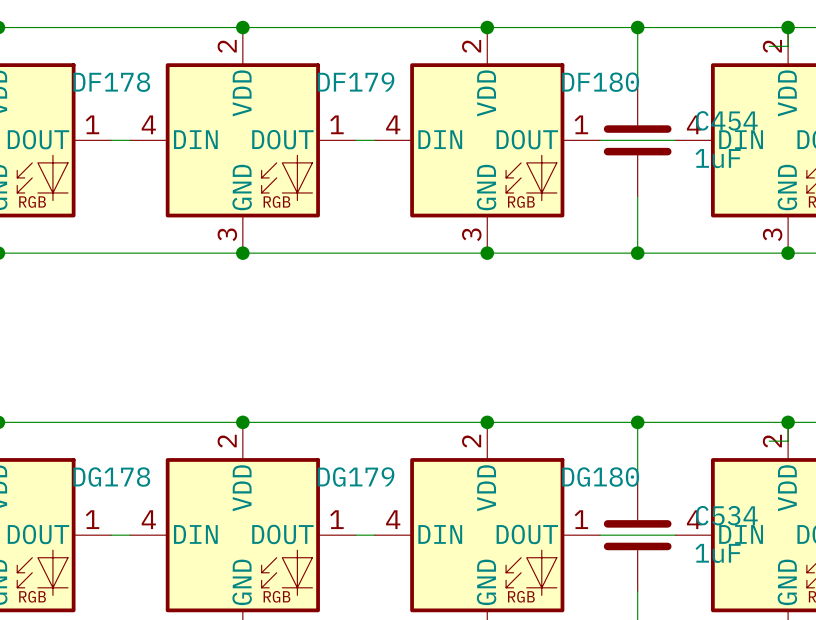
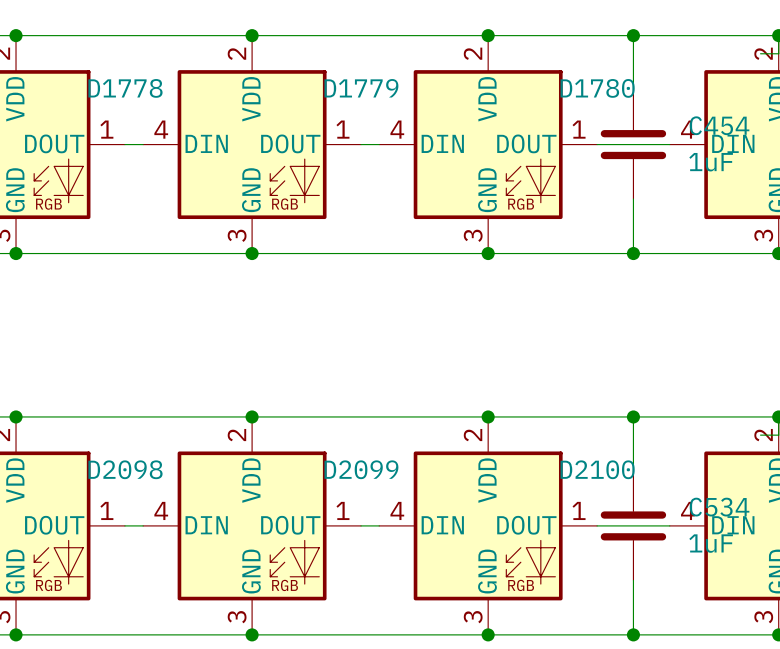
DF178 name: DF178 (111, 82) -> D1778 (125, 88)
DF179 name: DF179 (356, 82) -> D1779 (361, 88)
DF180 name: DF180 (600, 82) -> D1780 (597, 88)
DG178 name: DG178 (111, 477) -> D2098 (125, 469)
DG179 name: DG179 (356, 477) -> D2099 (361, 469)
DG180 name: DG180 (600, 477) -> D2100 (597, 469)

